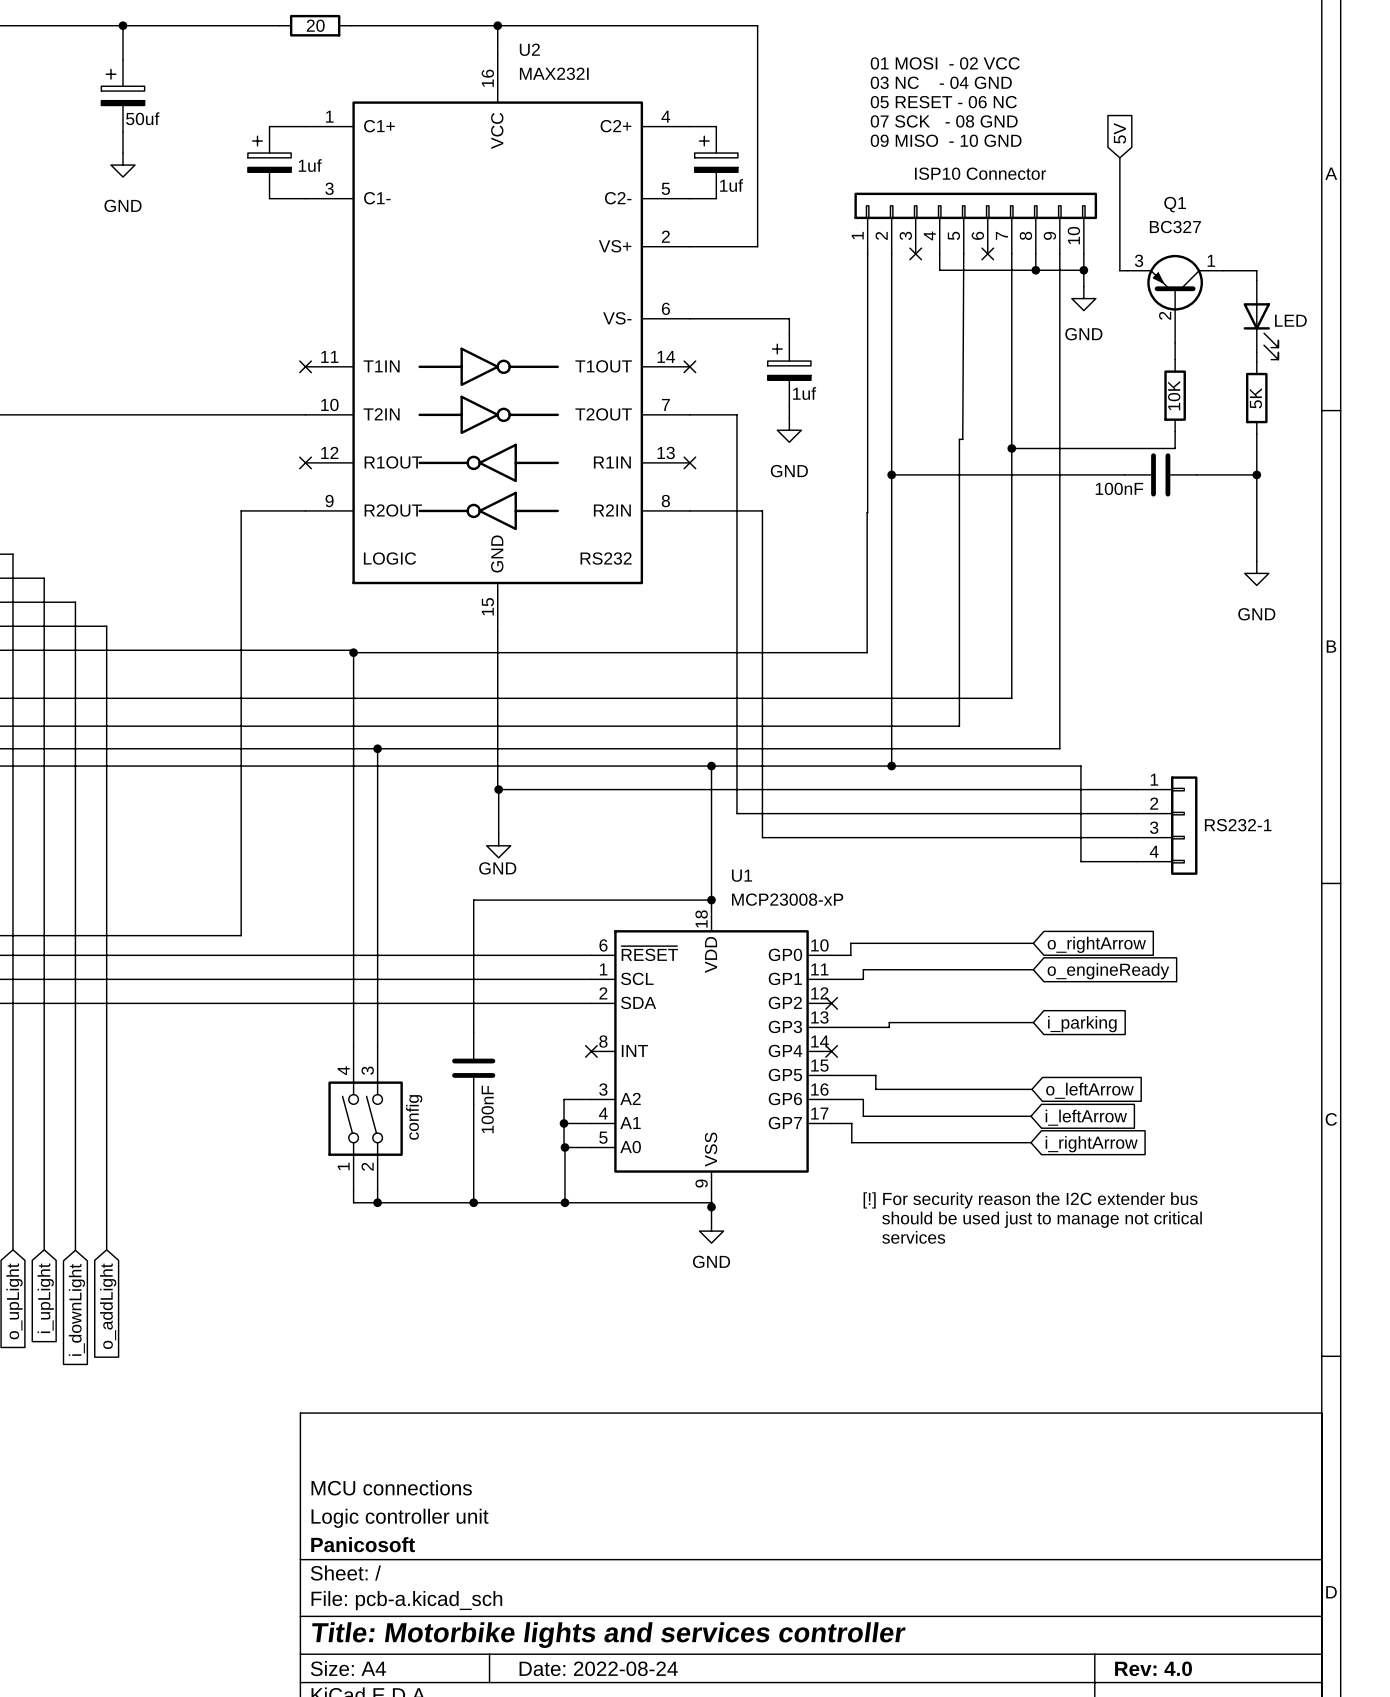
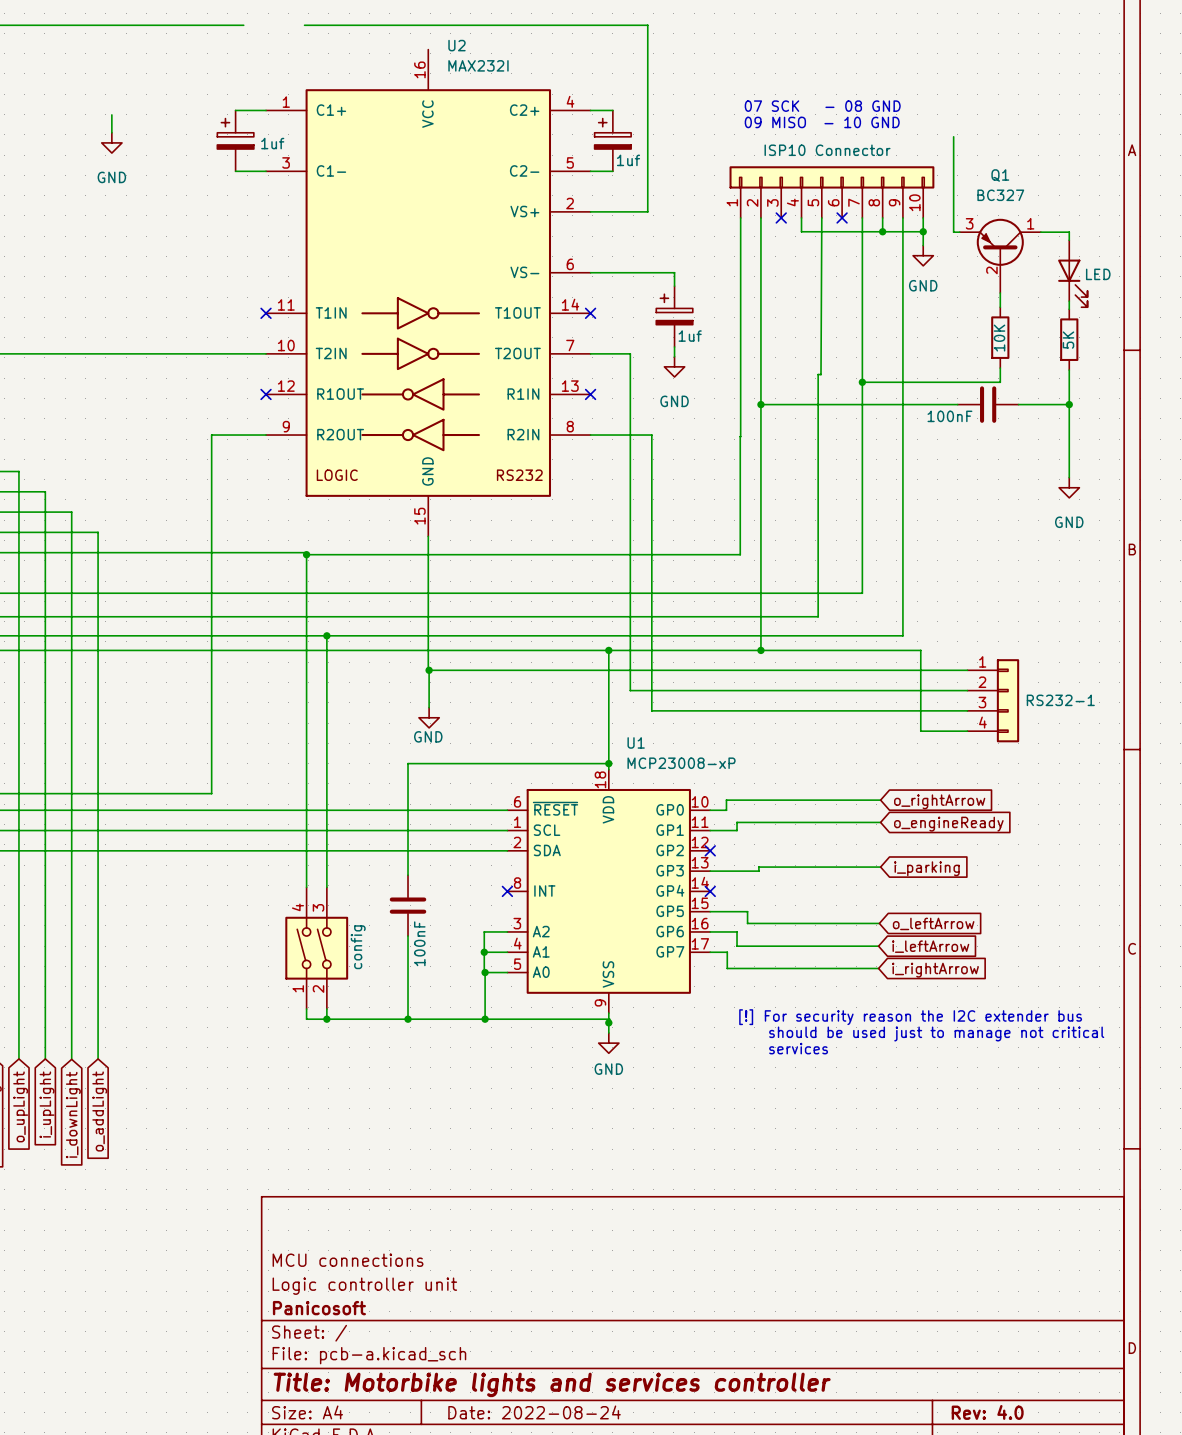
wire: (122, 25) (122, 59) -> none
junction: (122, 25) -> none
part: 20 (315, 25) -> none
wire: (497, 25) (497, 54) -> none
junction: (497, 25) -> none
text: 01 MOSI - 02 VCC (945, 63) -> none
text: 03 NC - 04 GND (941, 82) -> none
part: 50uf (122, 95) -> none
text: 05 RESET - 06 NC (943, 102) -> none
global label: 5V (1119, 133) -> none

